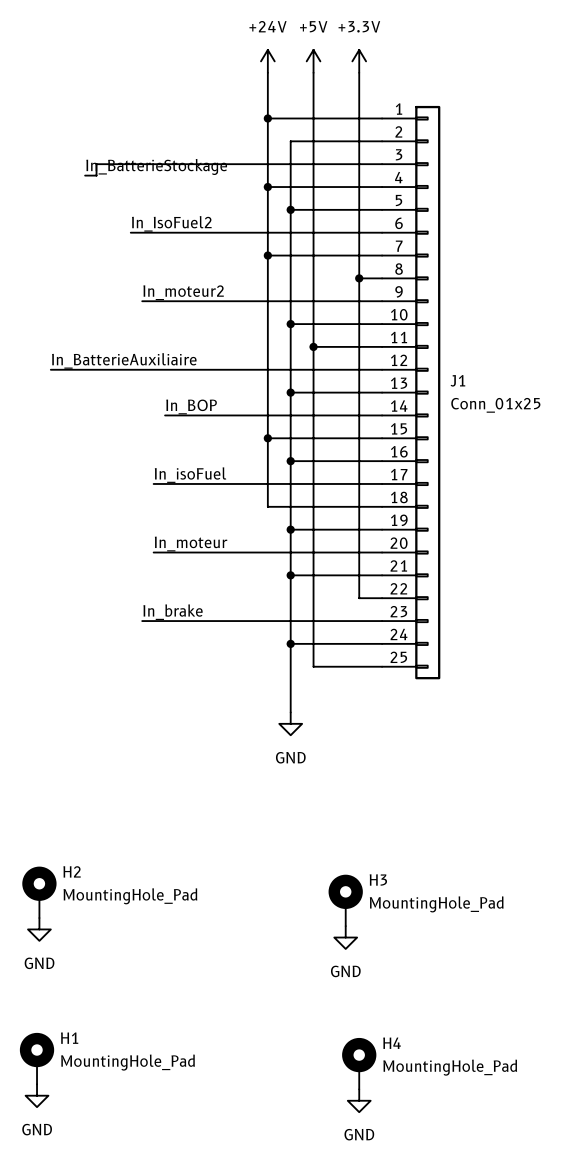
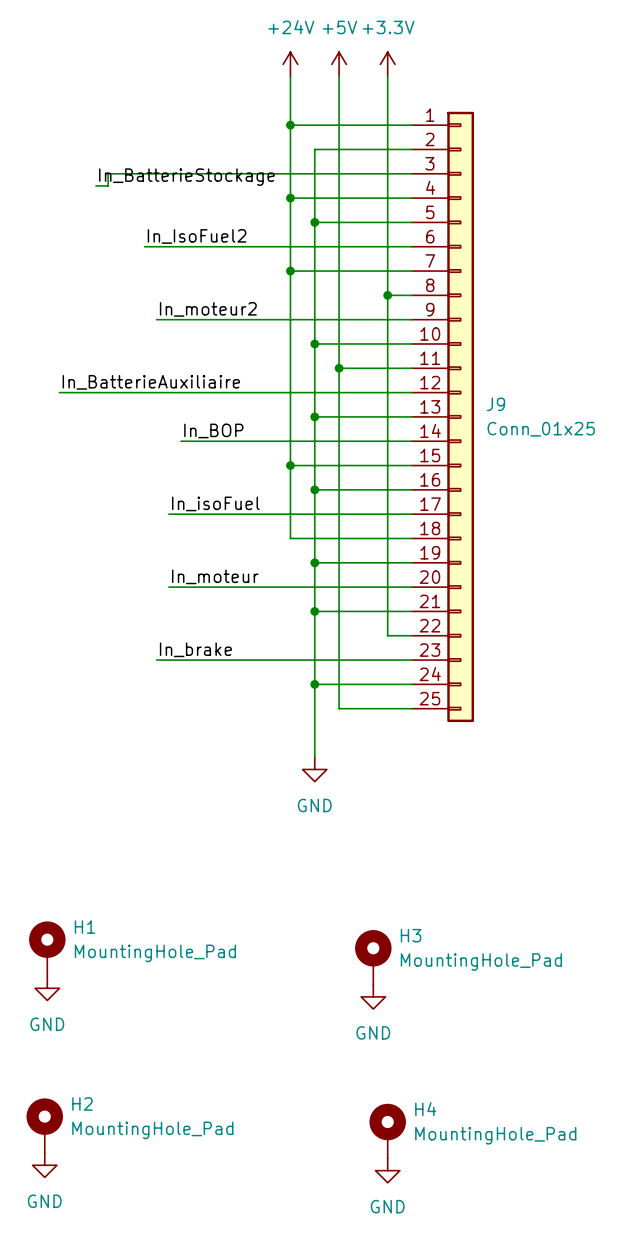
J1 name: J1 (457, 380) -> J9 (496, 404)
H2 name: H2 (72, 871) -> H1 (85, 927)
H1 name: H1 (69, 1038) -> H2 (82, 1104)

